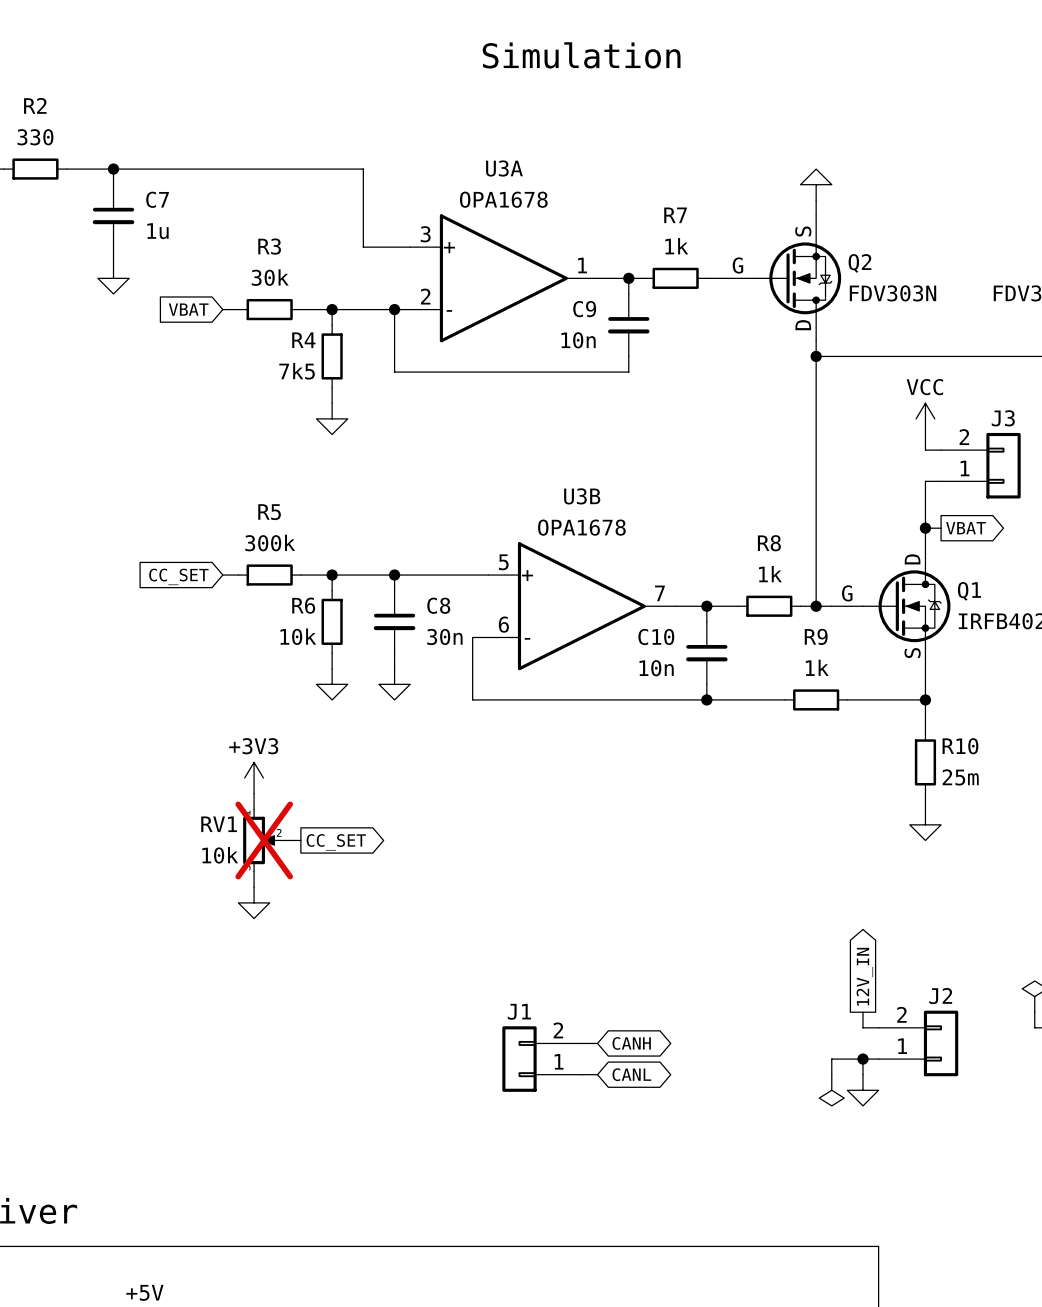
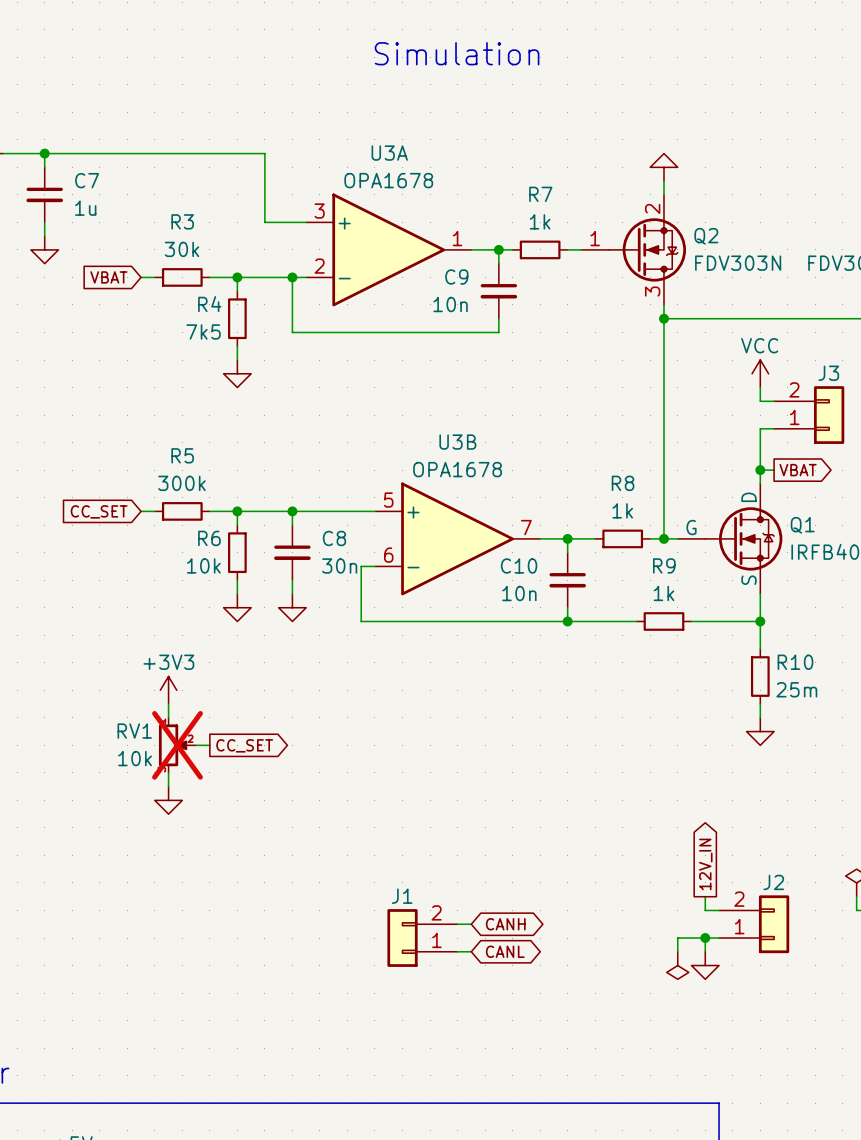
Q2 pin name: S (803, 231) -> none
Q2 pin number: none -> 2 (652, 208)
Q2 pin name: G (737, 265) -> none
Q2 pin number: none -> 1 (595, 238)
Q2 pin name: D (803, 325) -> none
Q2 pin number: none -> 3 (652, 291)

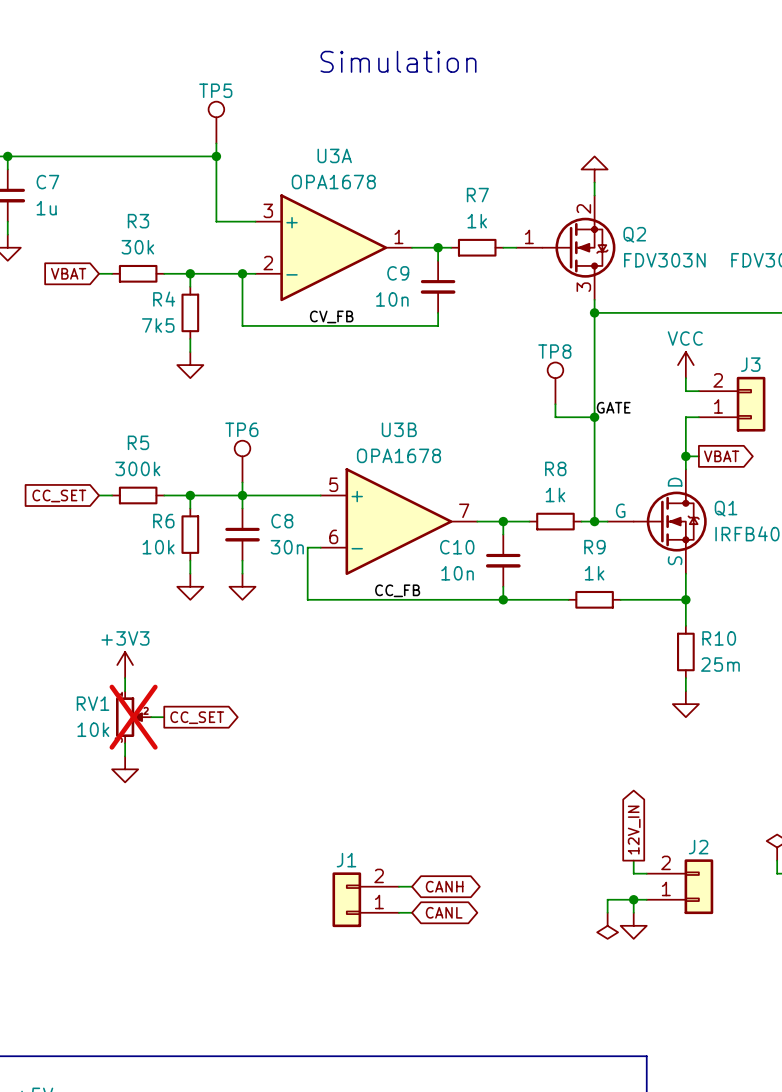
TP5: none -> (216, 122)
wire: none -> (216, 143) (216, 156)
junction: none -> (216, 156)
label: none -> CV_FB (331, 316)
TP8: none -> (555, 383)
wire: none -> (555, 404) (555, 417) (594, 417)
label: none -> GATE (613, 407)
junction: none -> (594, 417)
TP6: none -> (242, 461)
wire: none -> (242, 482) (242, 495)
label: none -> CC_FB (397, 590)

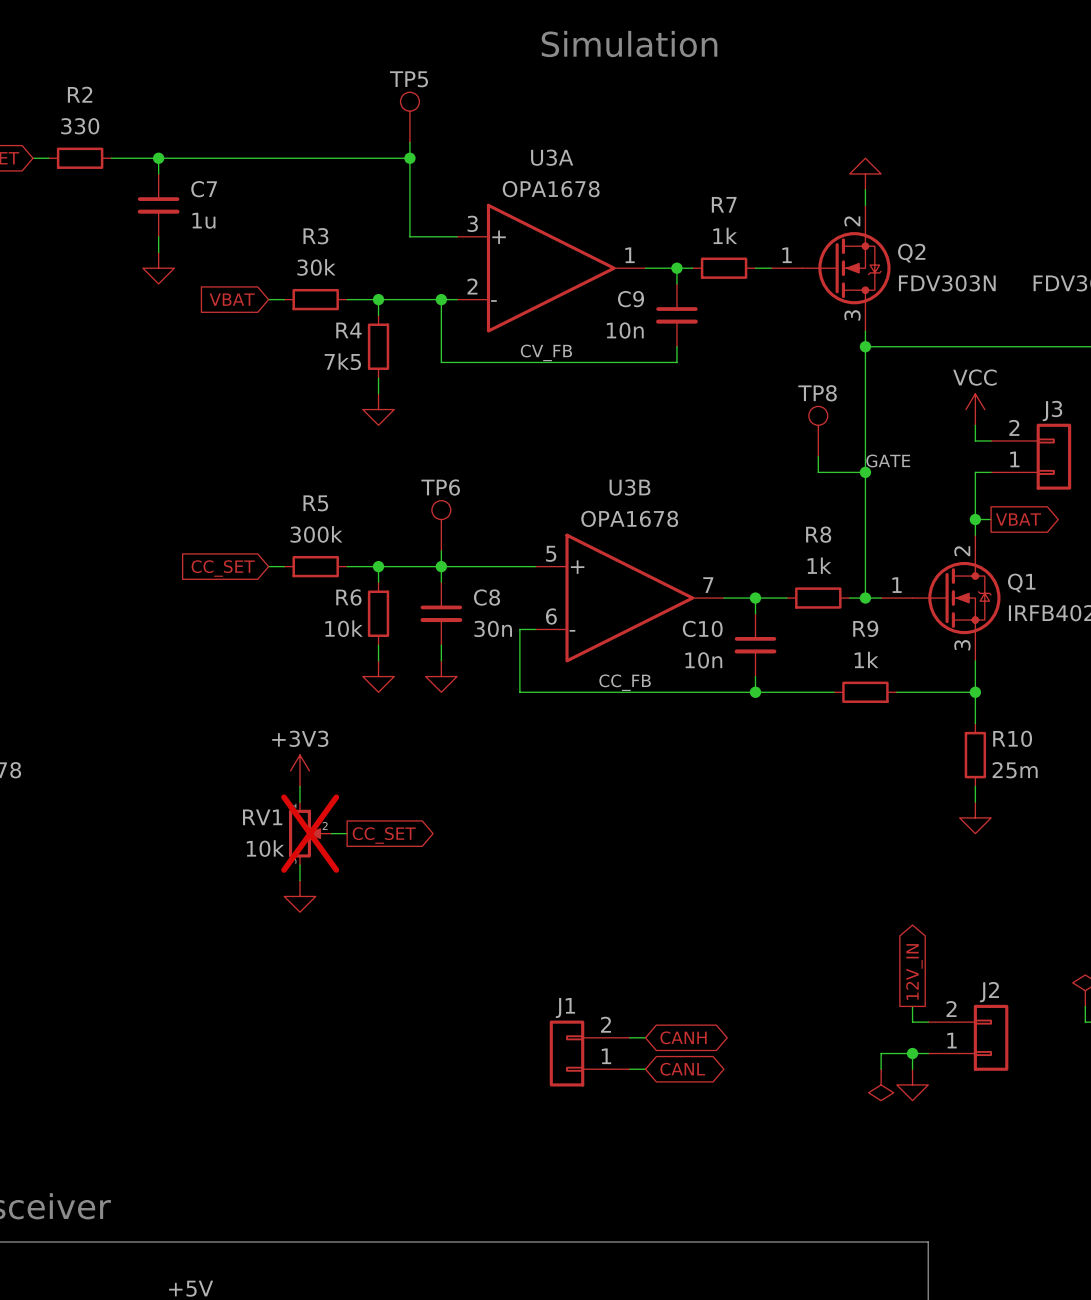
Q1 pin name: D (675, 482) -> none
Q1 pin number: none -> 2 (962, 551)
Q1 pin name: G (620, 510) -> none
Q1 pin number: none -> 1 (897, 585)
Q1 pin name: S (675, 560) -> none
Q1 pin number: none -> 3 (962, 645)

